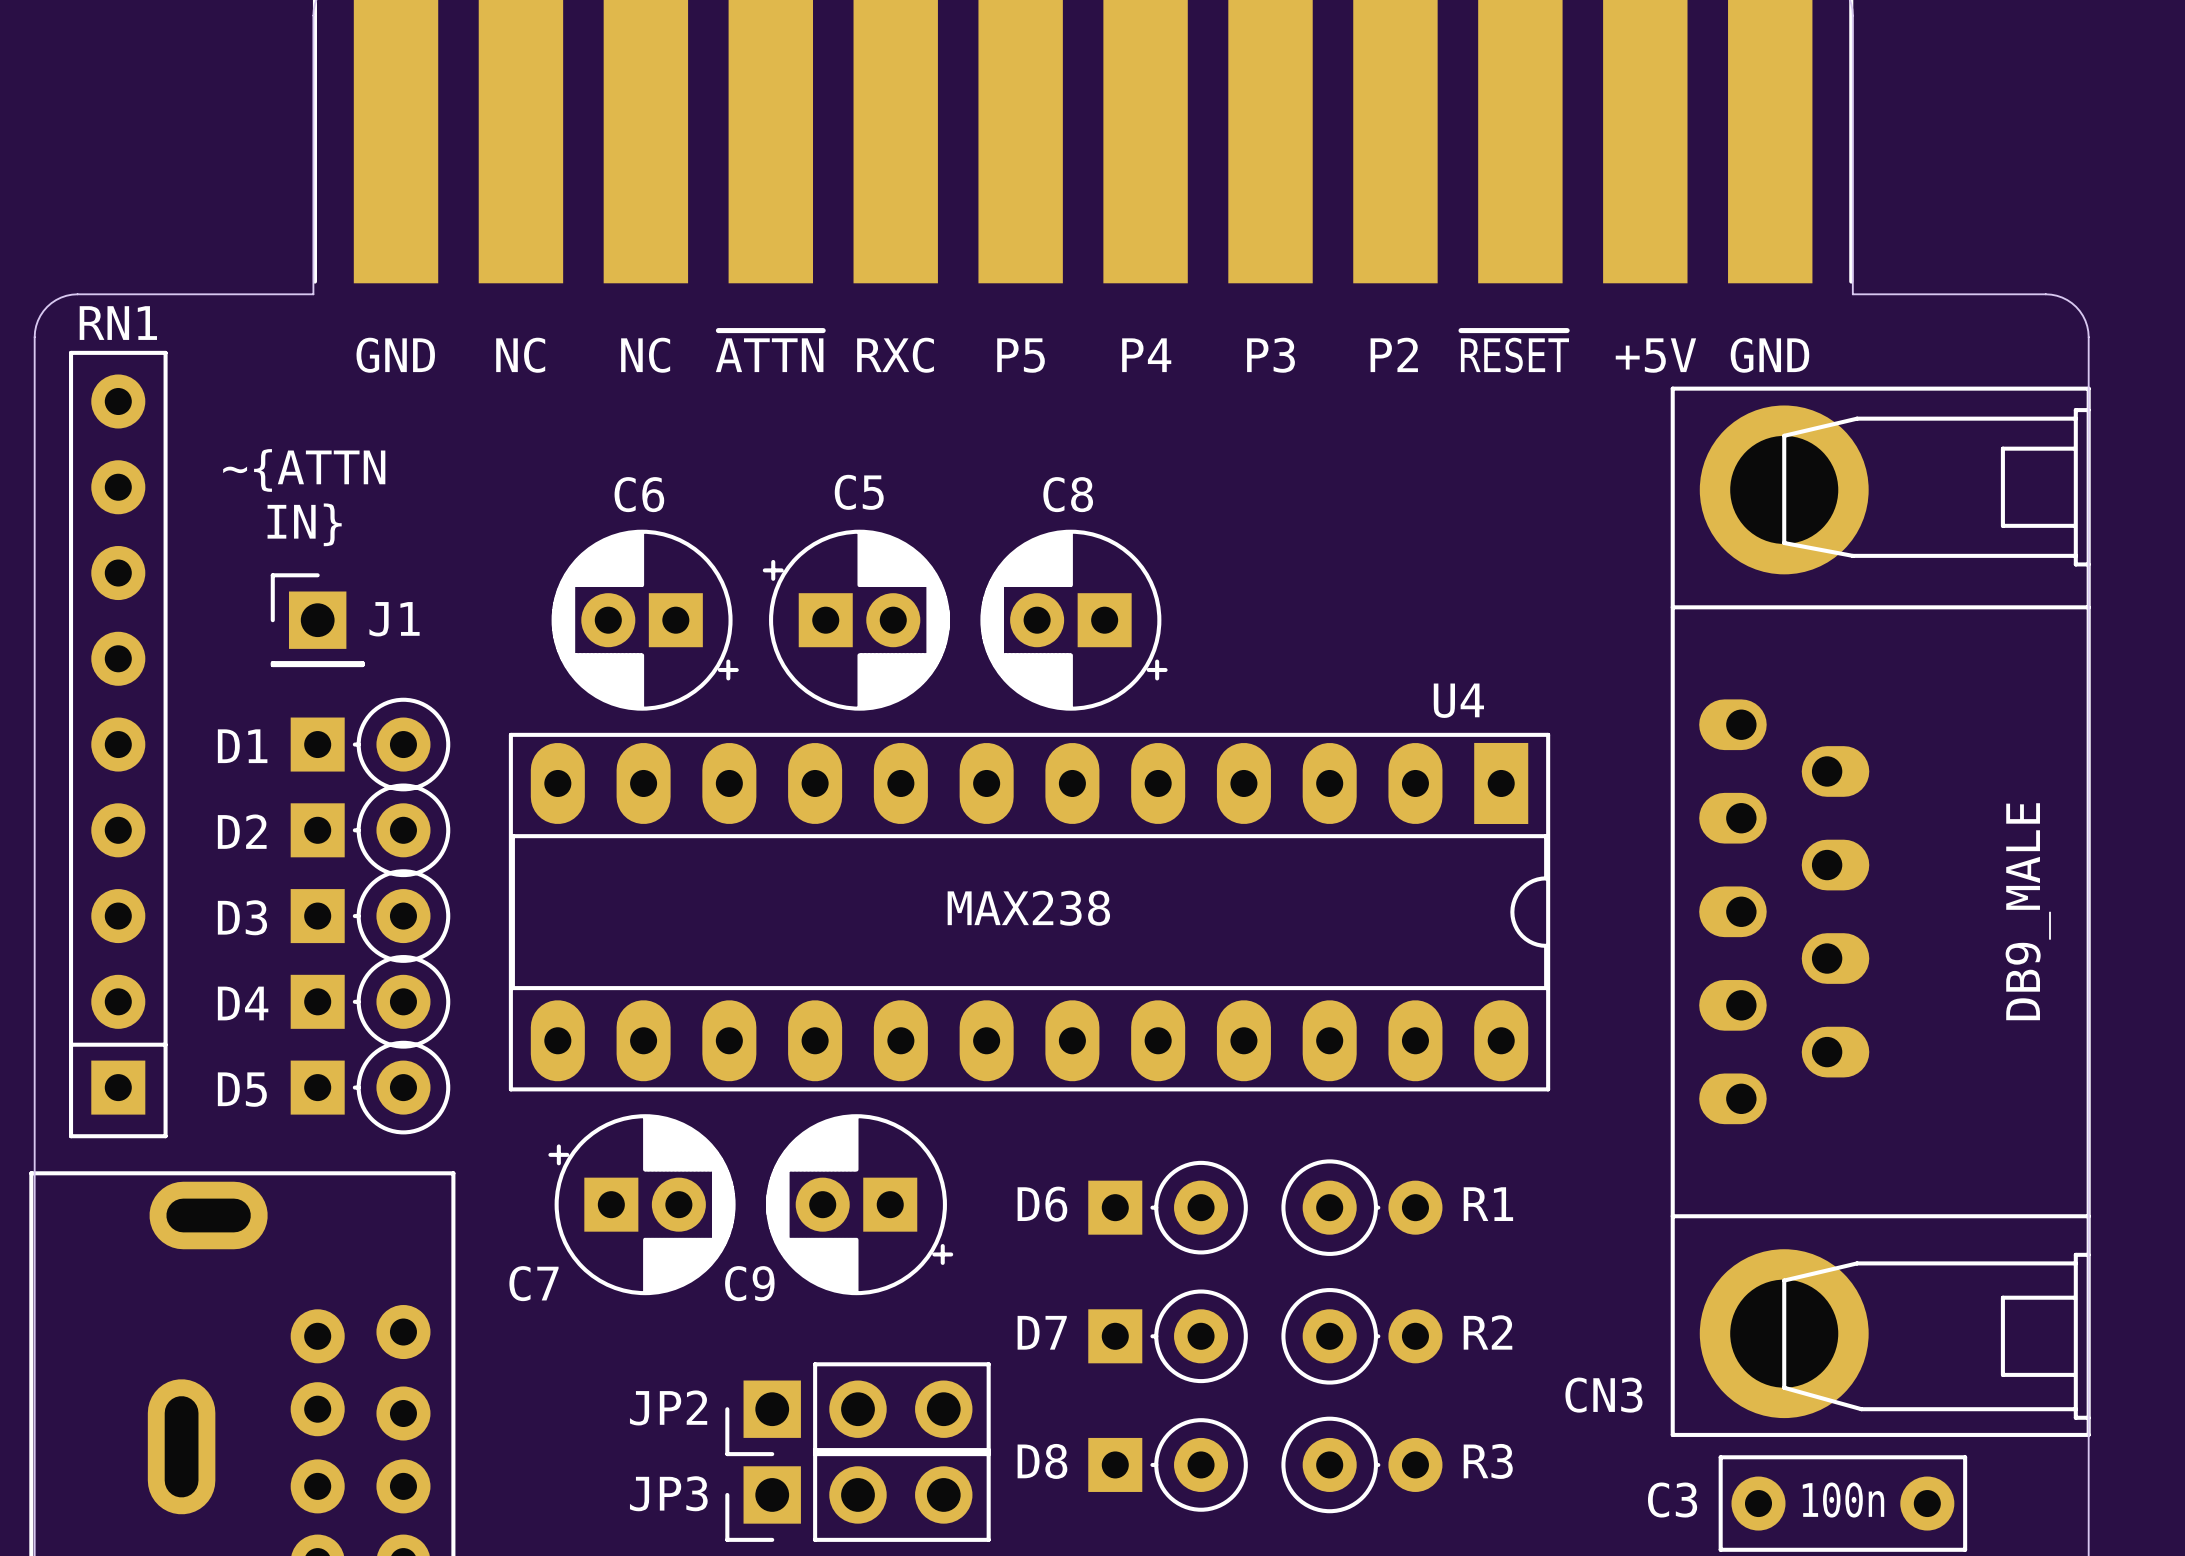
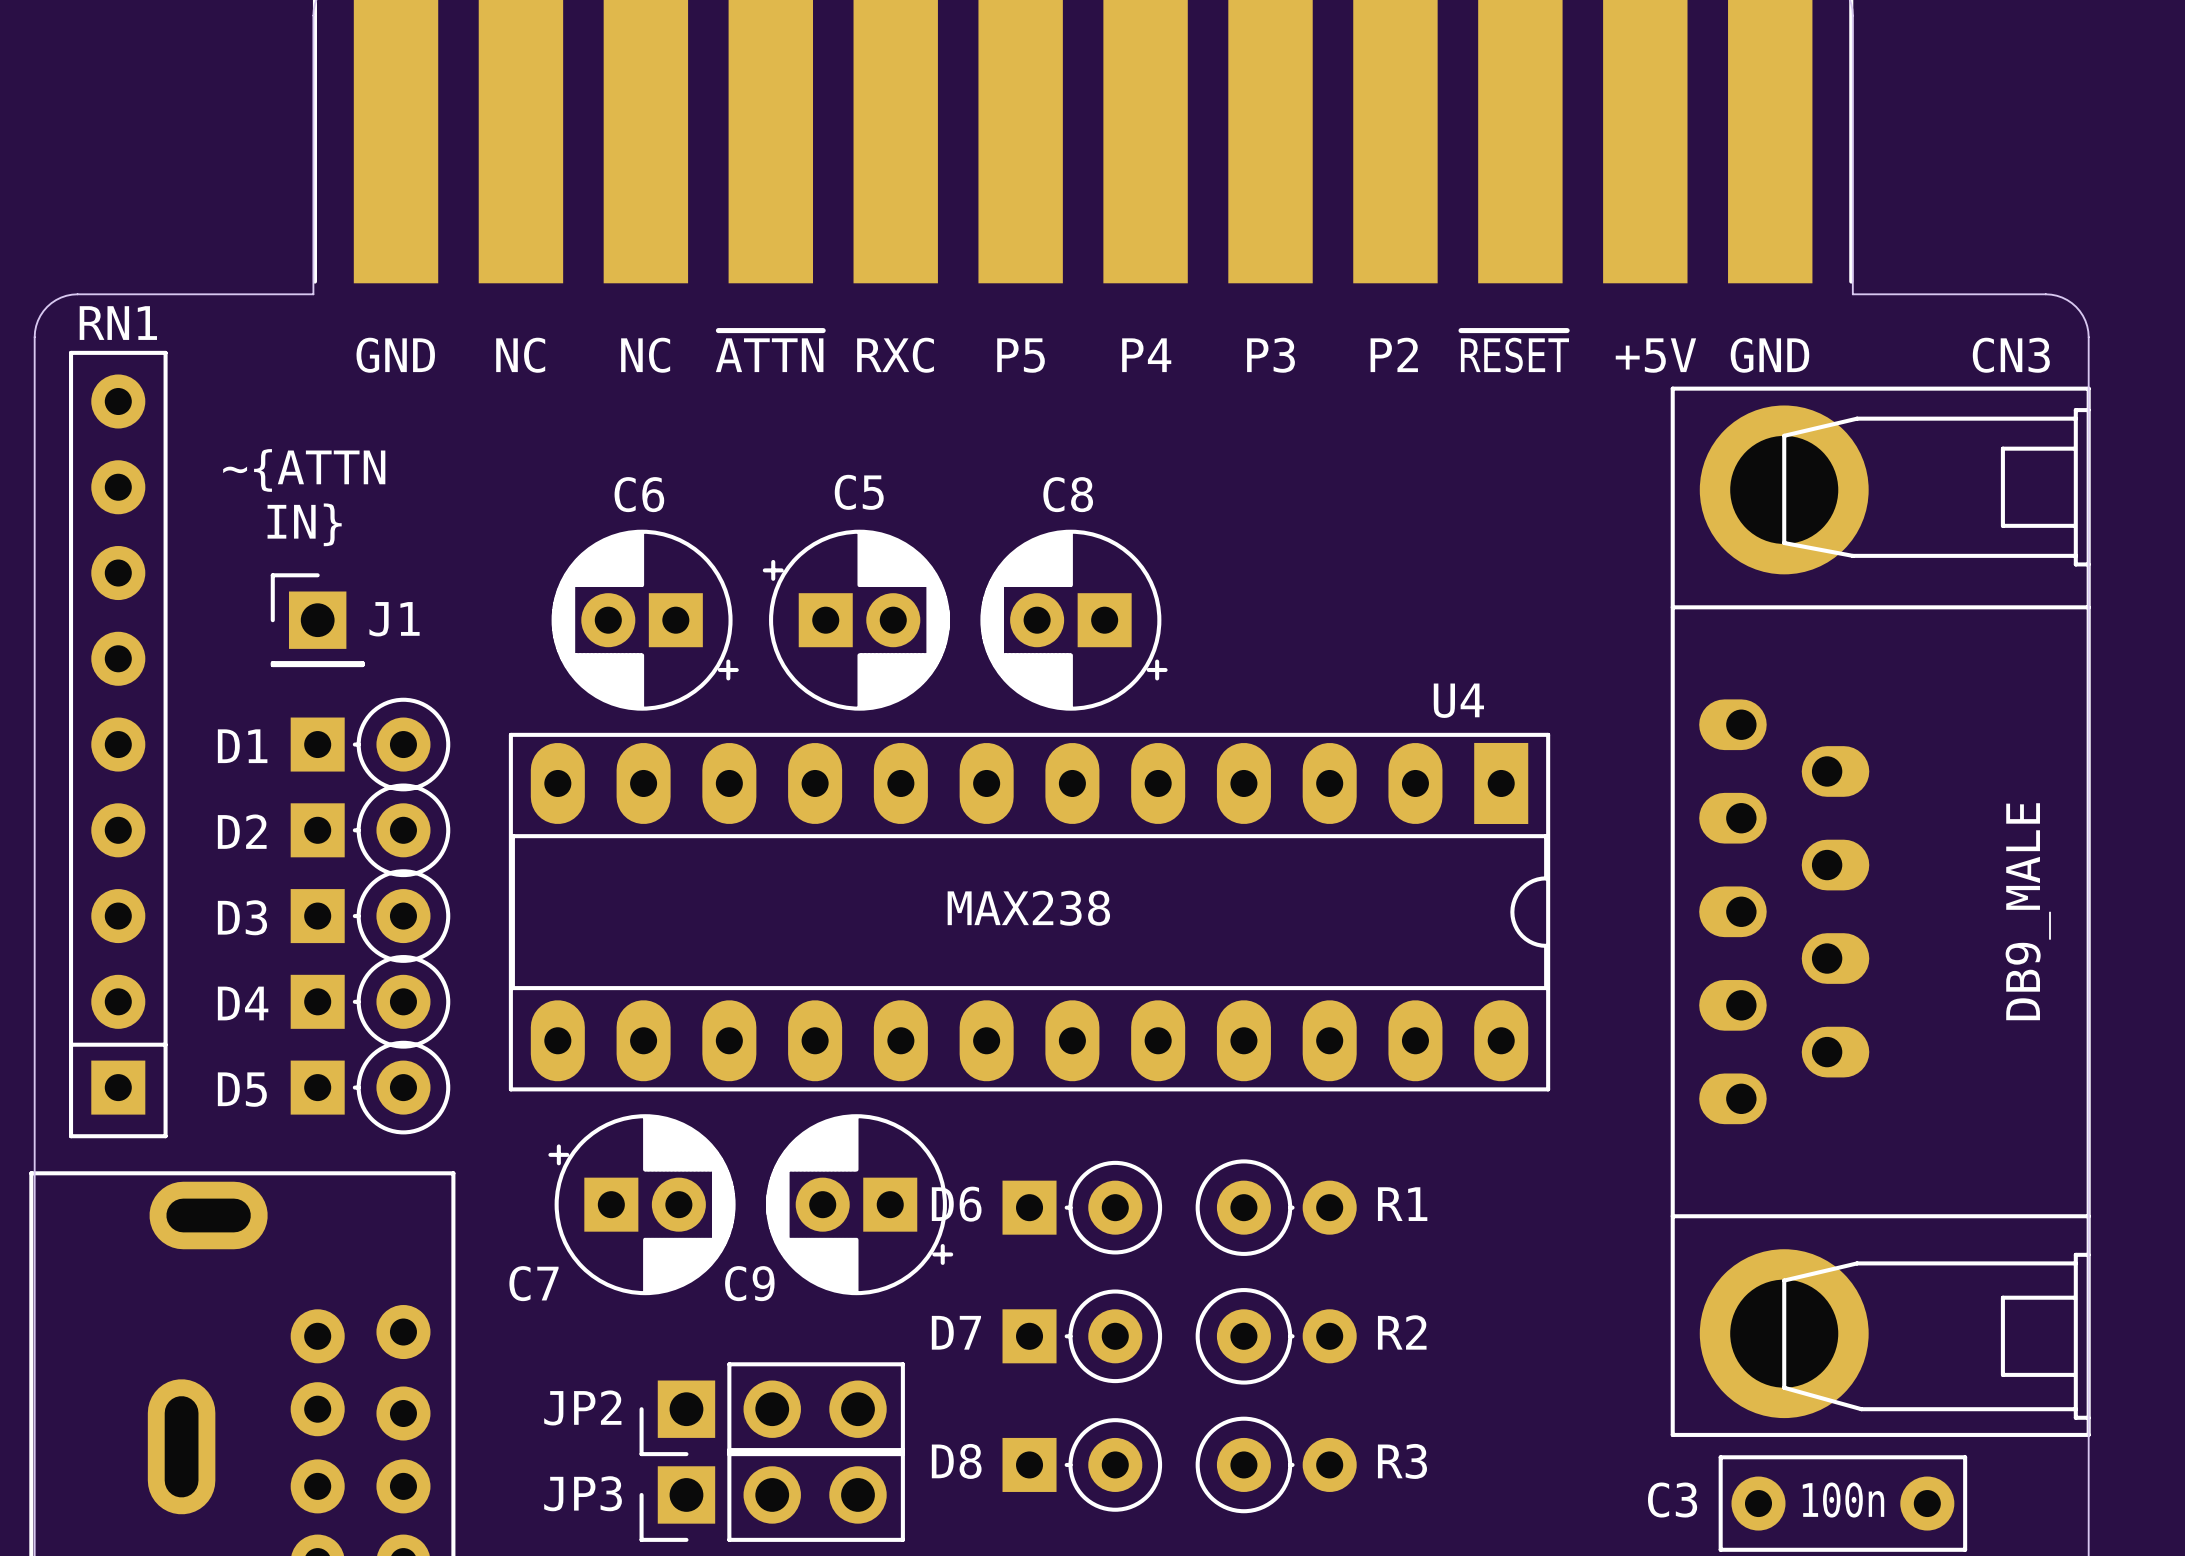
D6 position: (1168, 1207) -> (1082, 1207)
R1 position: (1361, 1207) -> (1276, 1207)
D7 position: (1168, 1336) -> (1082, 1336)
R2 position: (1361, 1336) -> (1276, 1336)
CN3 name position: CN3 (1603, 1395) -> CN3 (2011, 355)
JP2 position: (857, 1409) -> (772, 1409)
D8 position: (1168, 1464) -> (1082, 1464)
R3 position: (1361, 1464) -> (1276, 1464)
JP3 position: (857, 1494) -> (772, 1494)

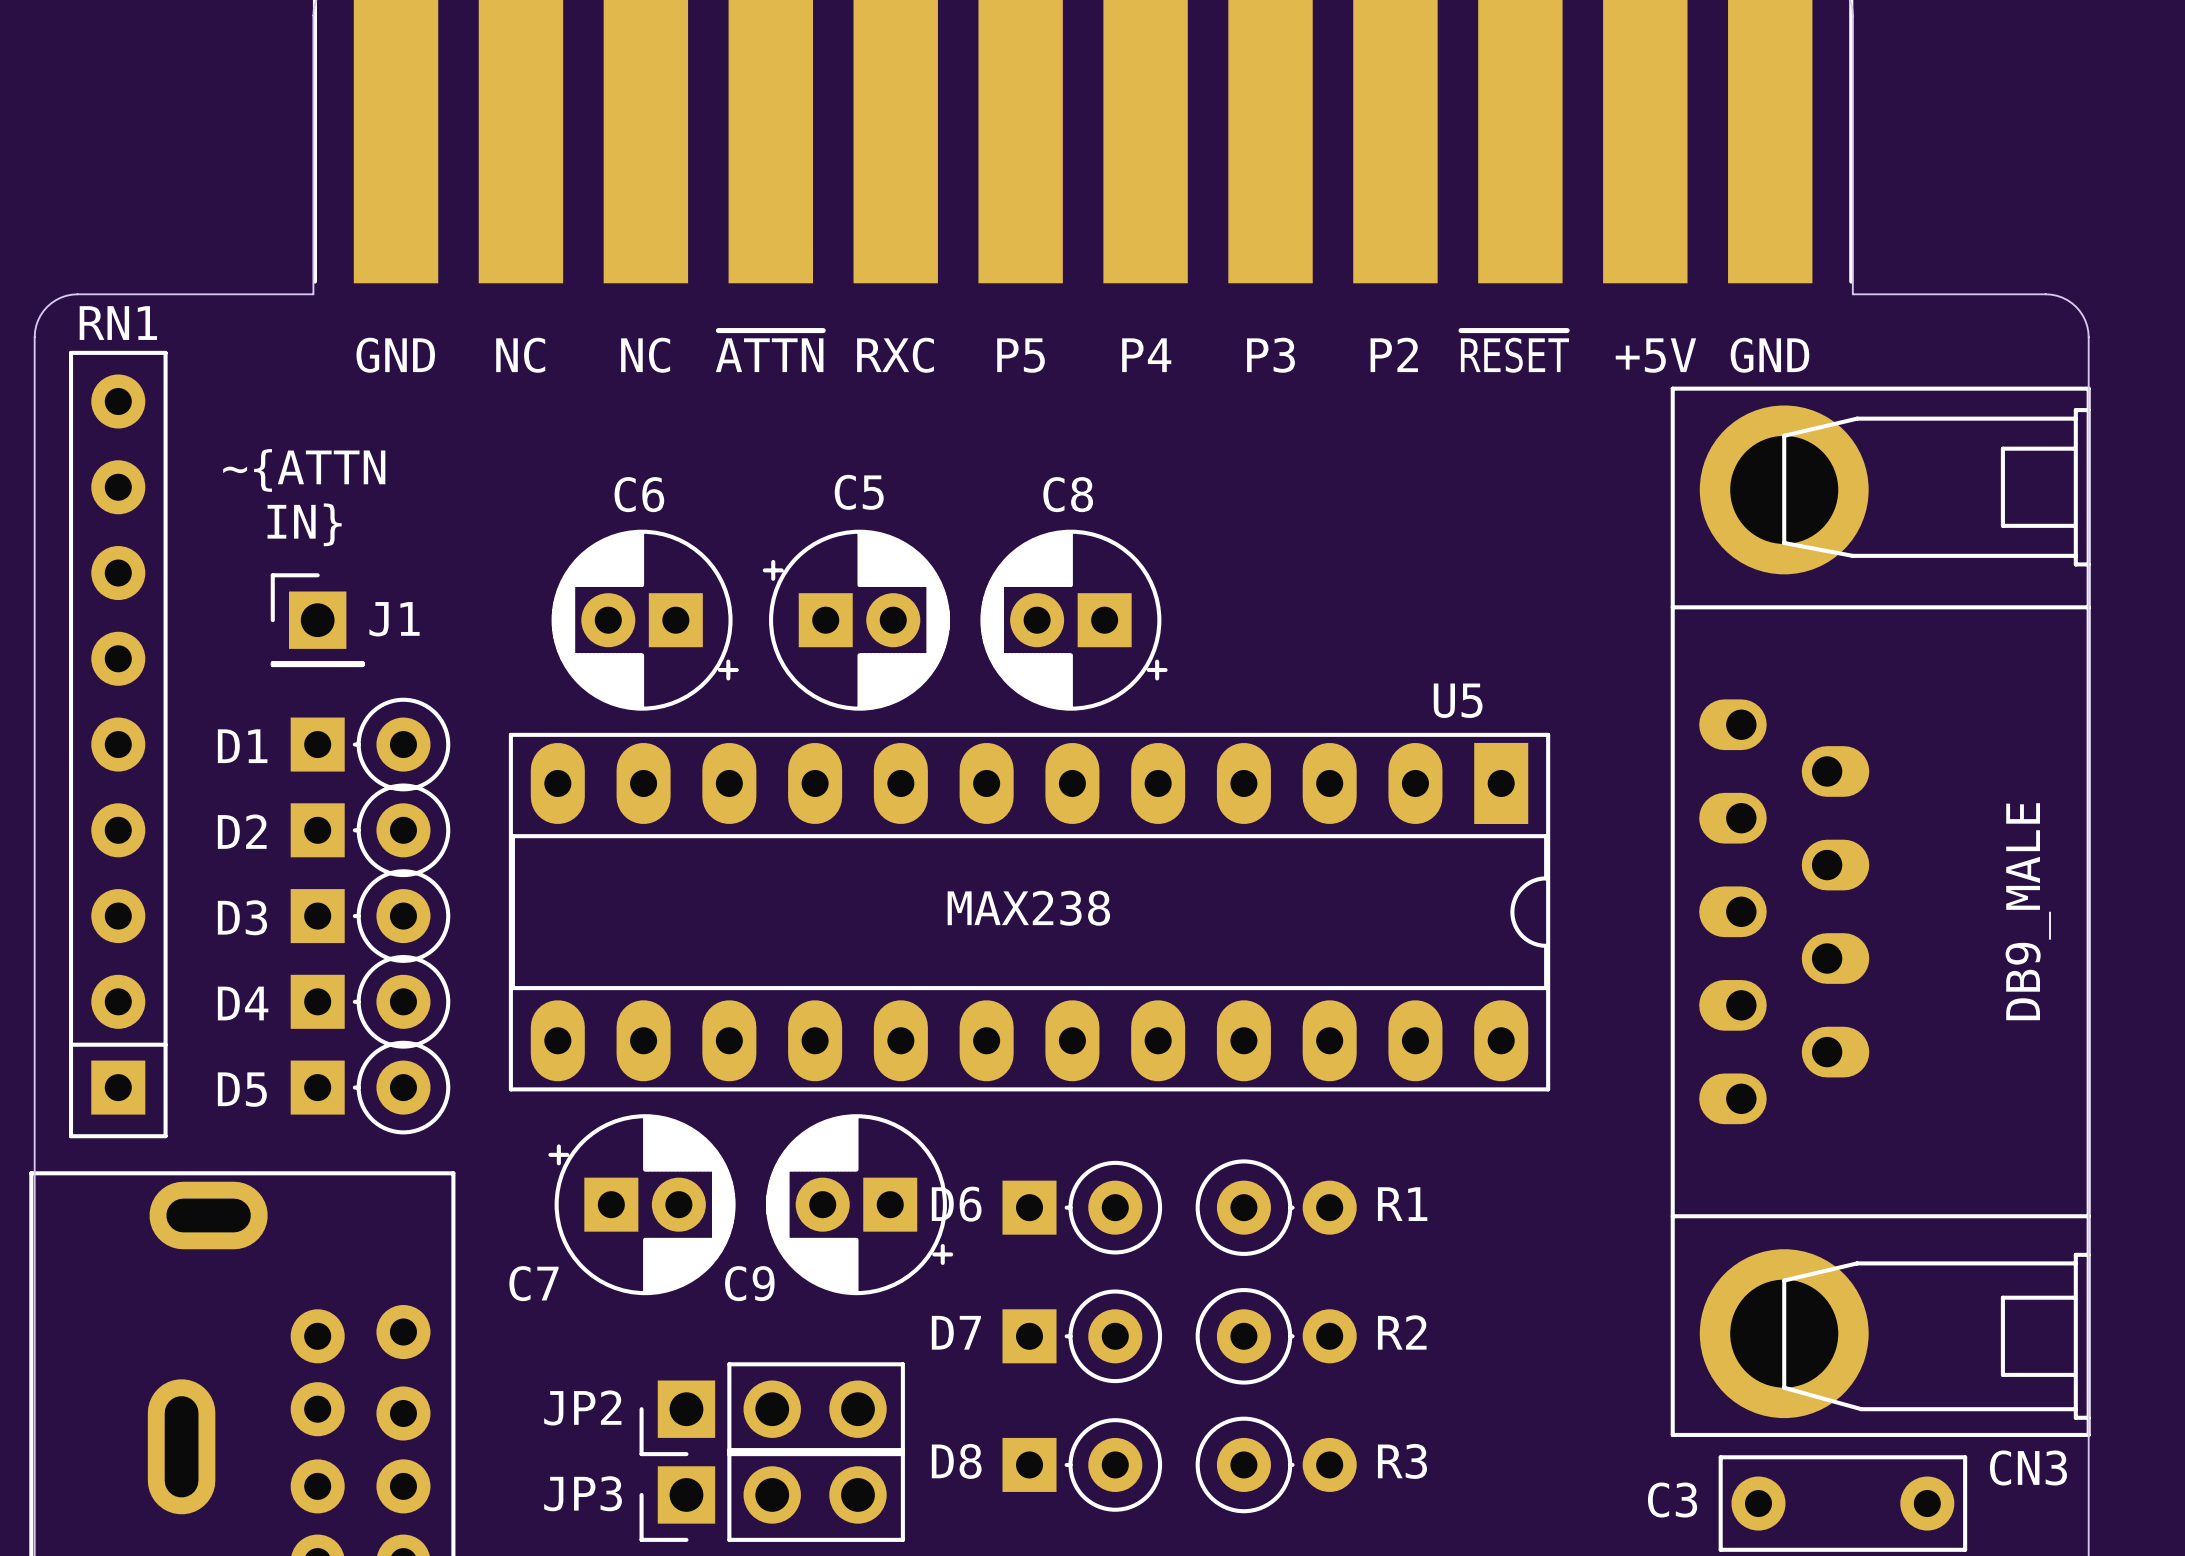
CN3 name position: CN3 (2011, 355) -> CN3 (2028, 1468)
U4 name: U4 (1458, 700) -> U5 (1458, 700)
C3 value: 100n (1843, 1500) -> none

